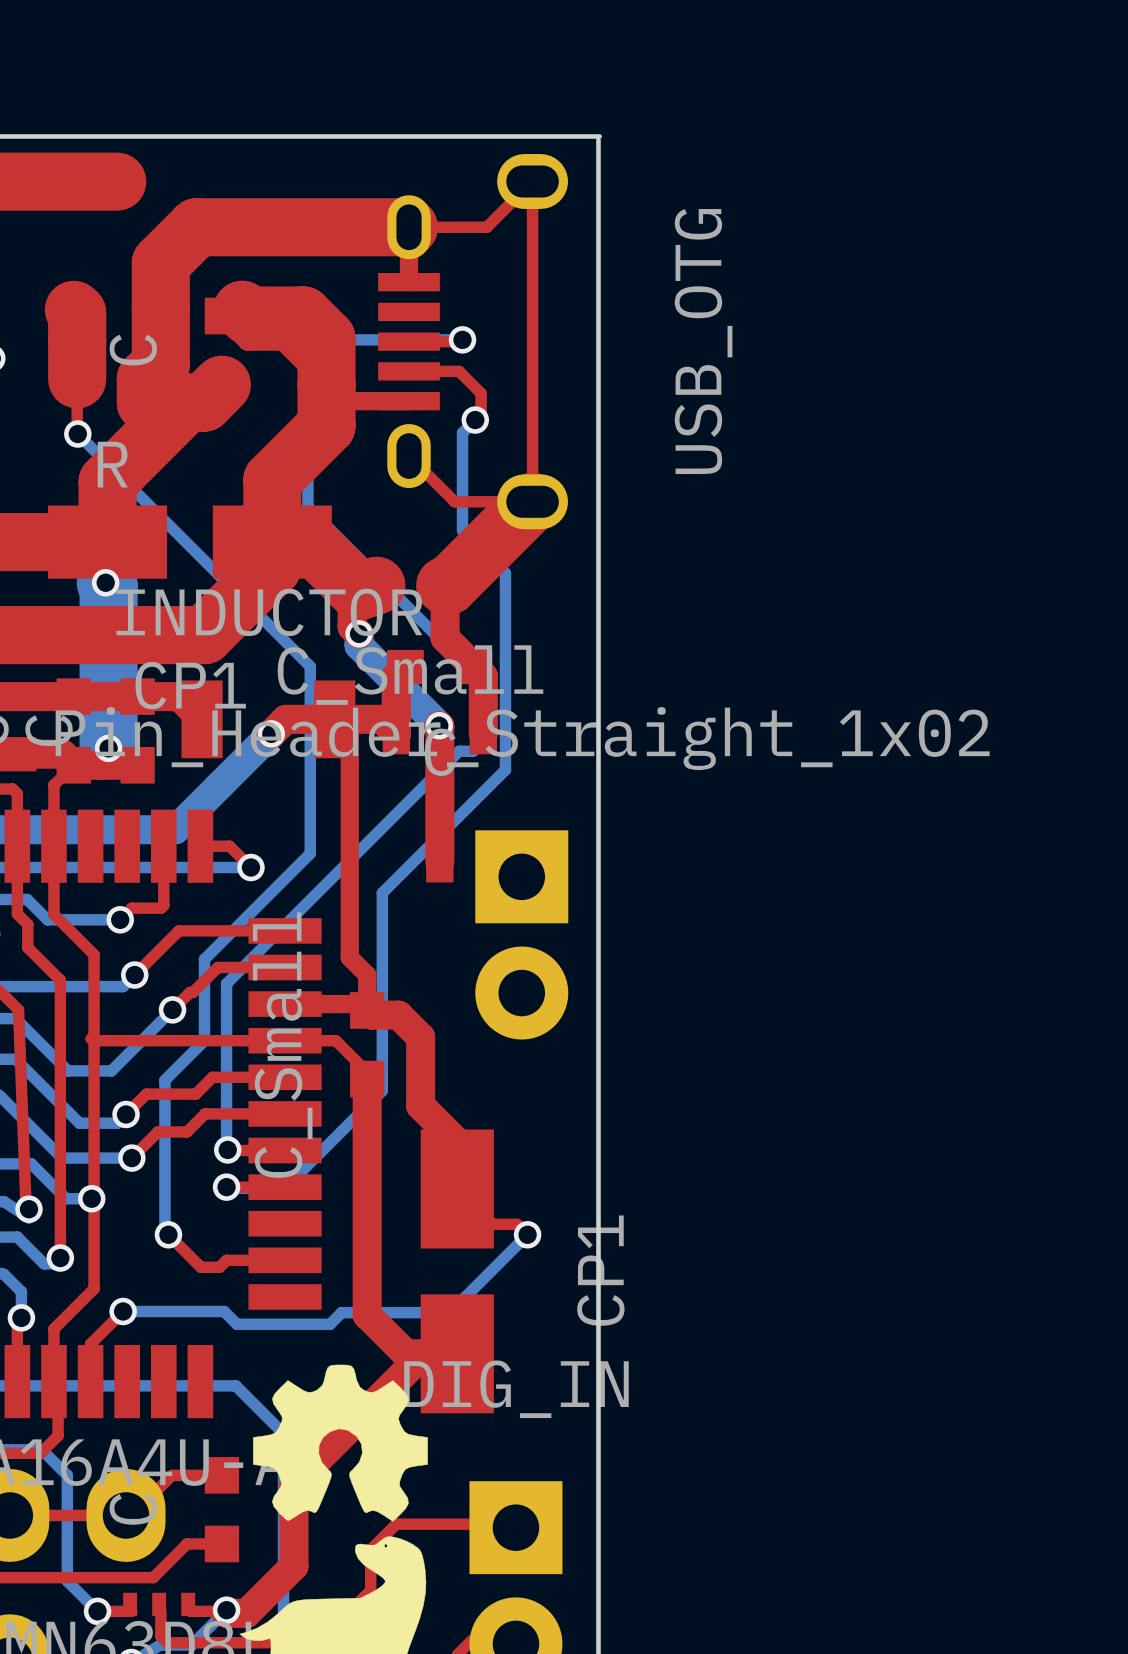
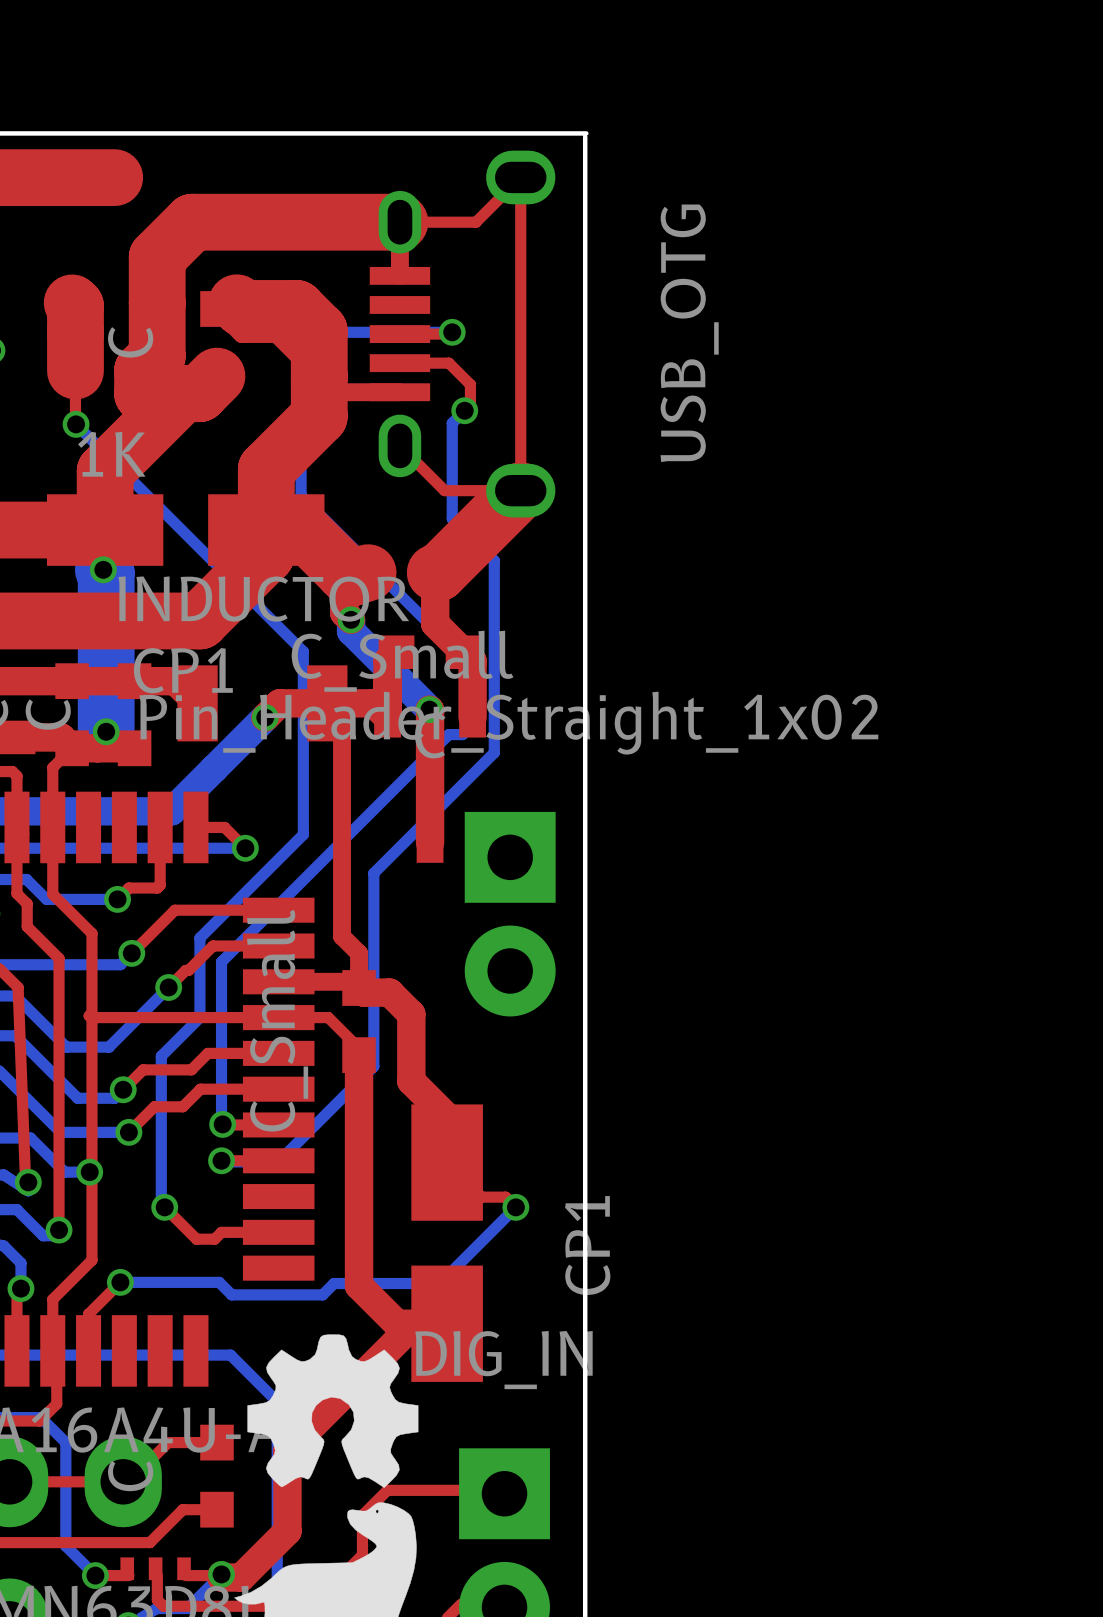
part value: R (112, 464) -> 1K (111, 454)

